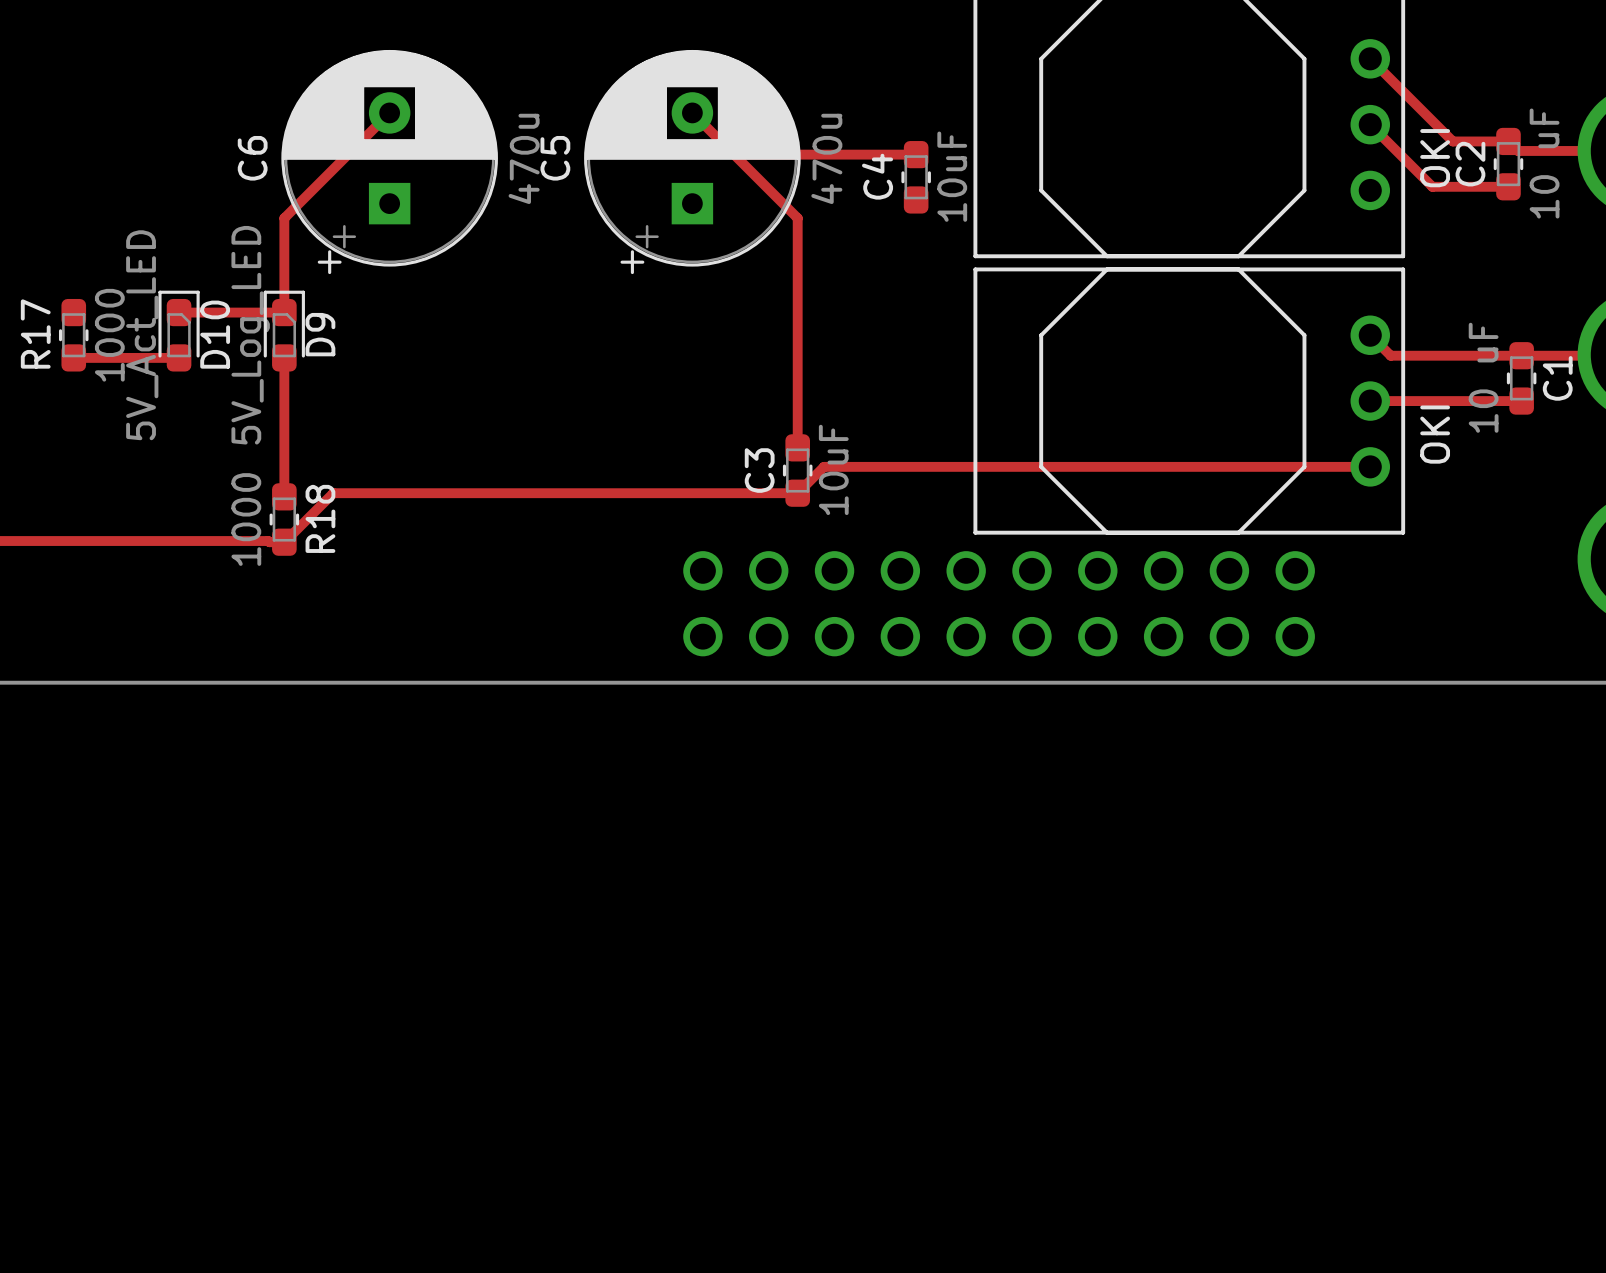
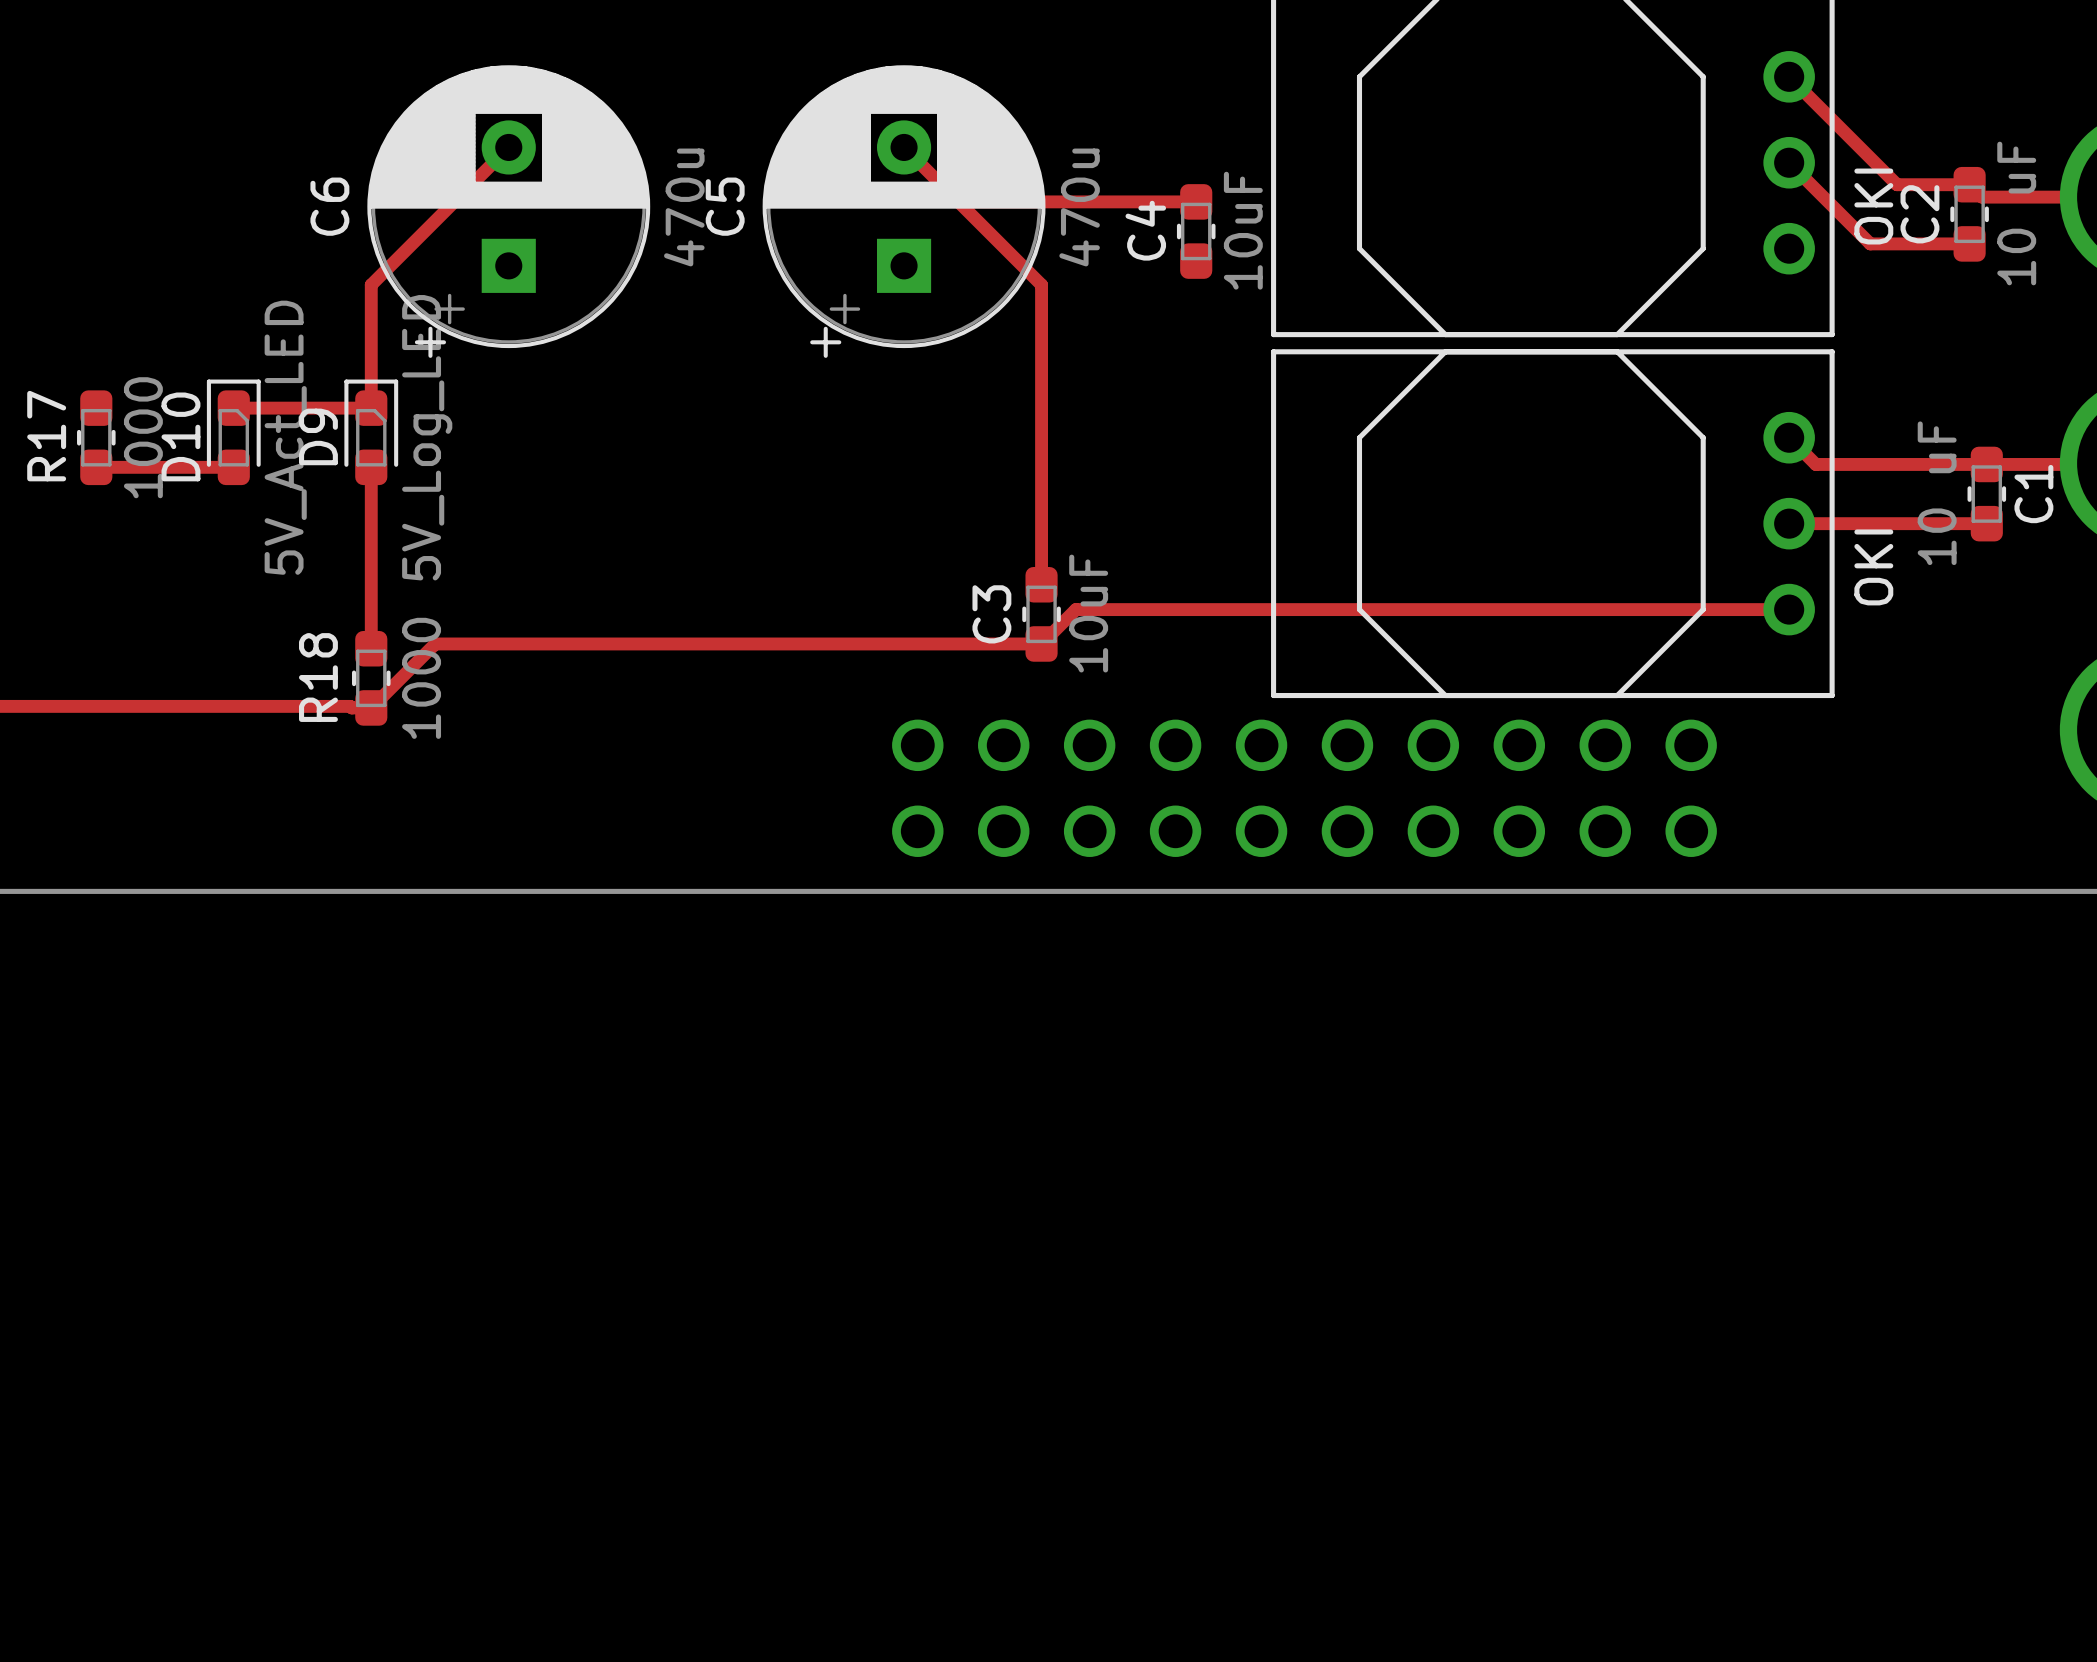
D10 name position: D10 (215, 334) -> D10 (180, 436)
D9 name position: D9 (320, 334) -> D9 (318, 436)
D10 value position: 5V_Act_LED (142, 335) -> 5V_Act_LED (285, 437)
D9 value position: 5V_Log_LED (250, 335) -> 5V_Log_LED (427, 437)
R18 name position: R18 (320, 518) -> R18 (318, 677)
R18 value position: 1000 (246, 519) -> 1000 (421, 678)

